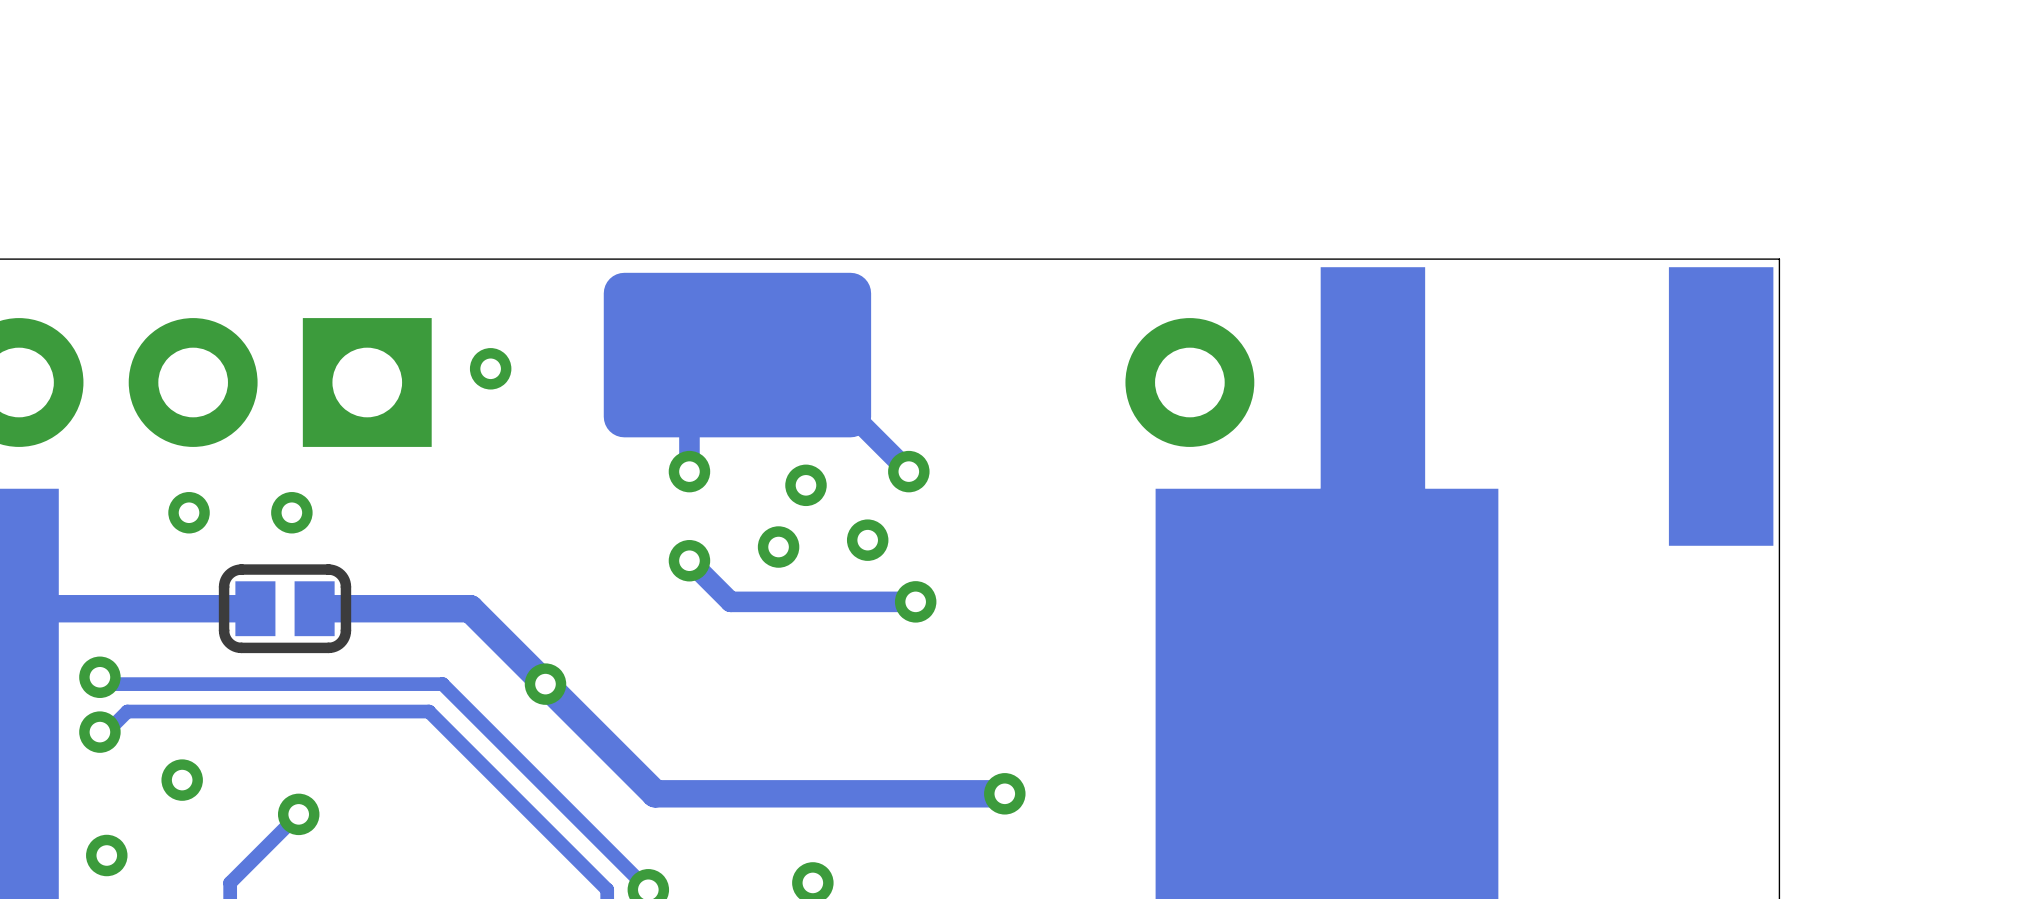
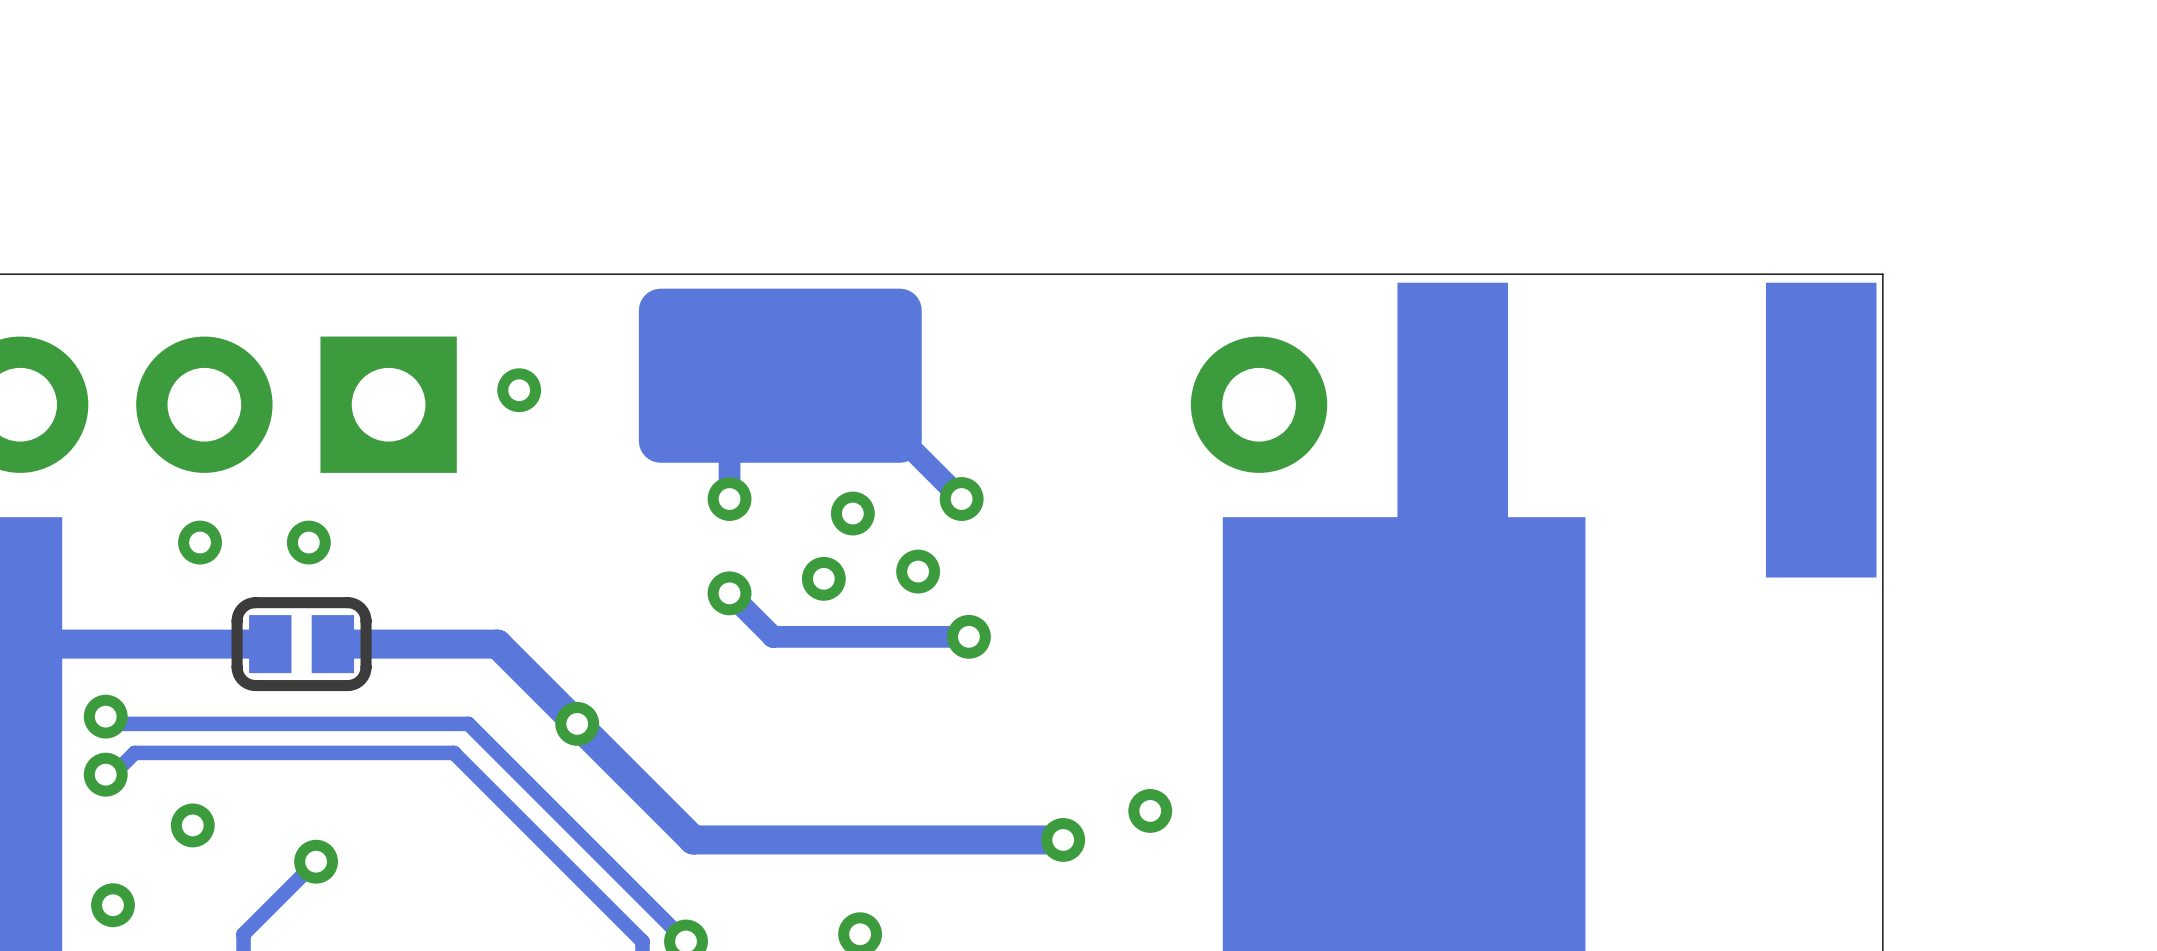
via: none -> (1150, 810)

